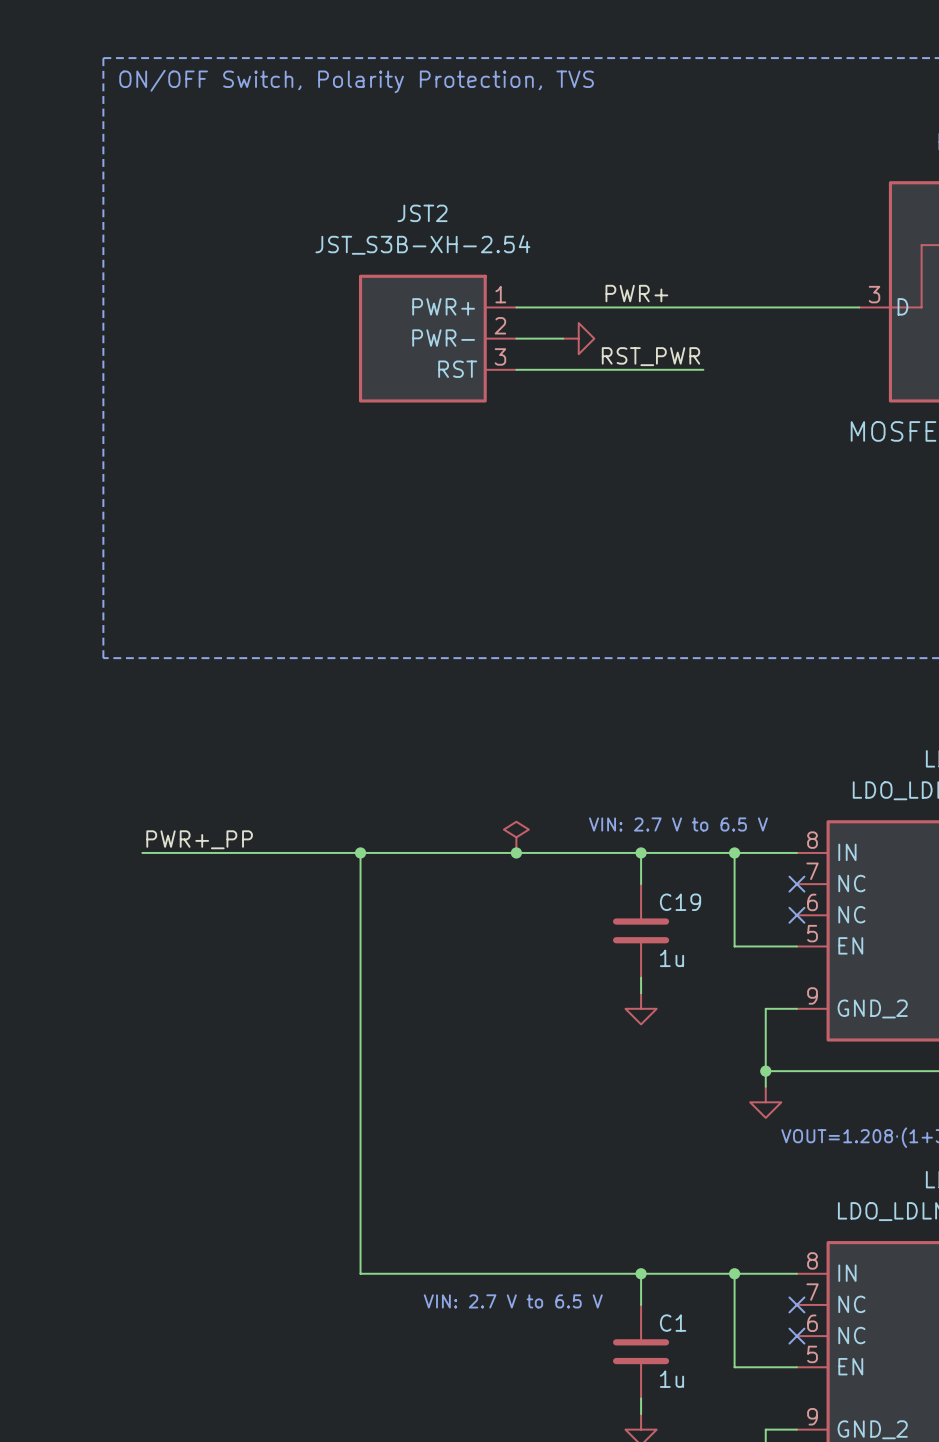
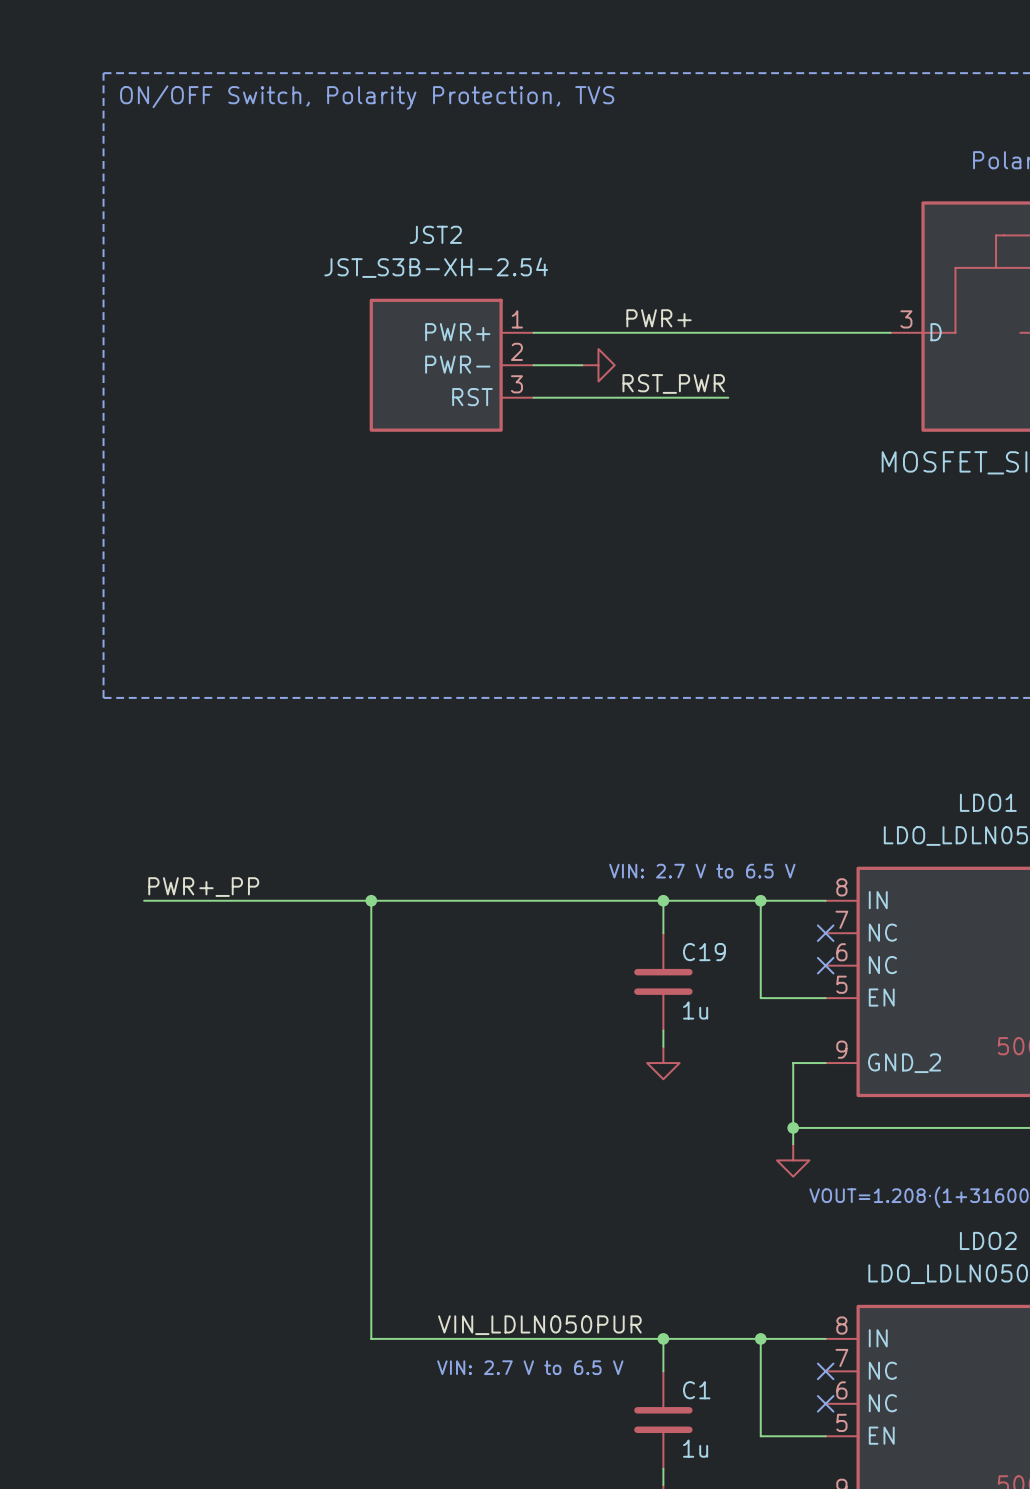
power symbol: (516, 837) -> none
junction: (516, 852) -> none
label: none -> VIN_LDLN050PUR (539, 1325)

